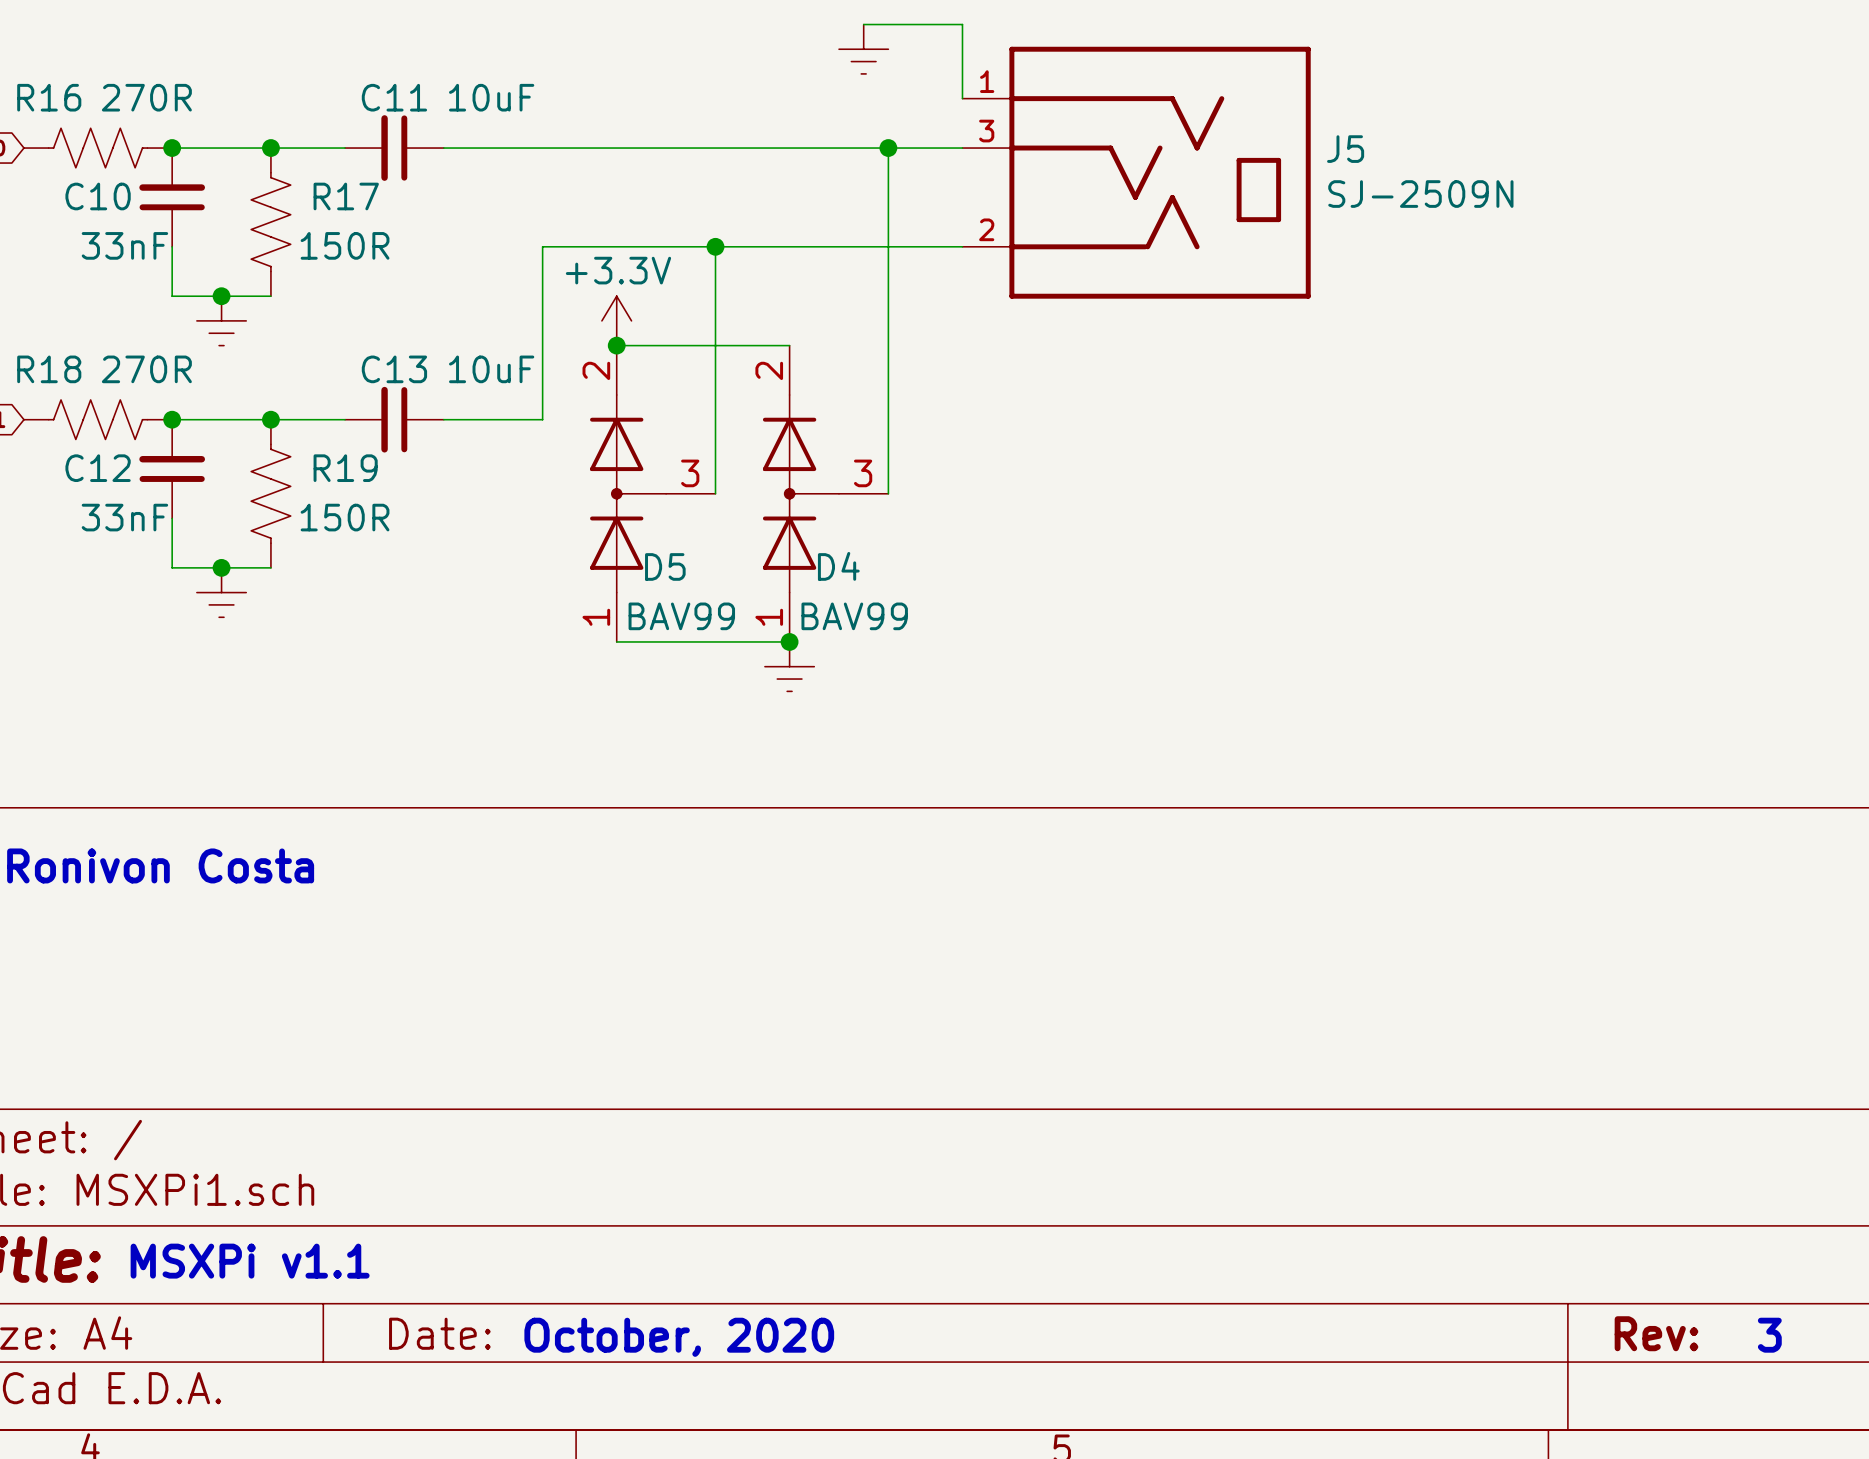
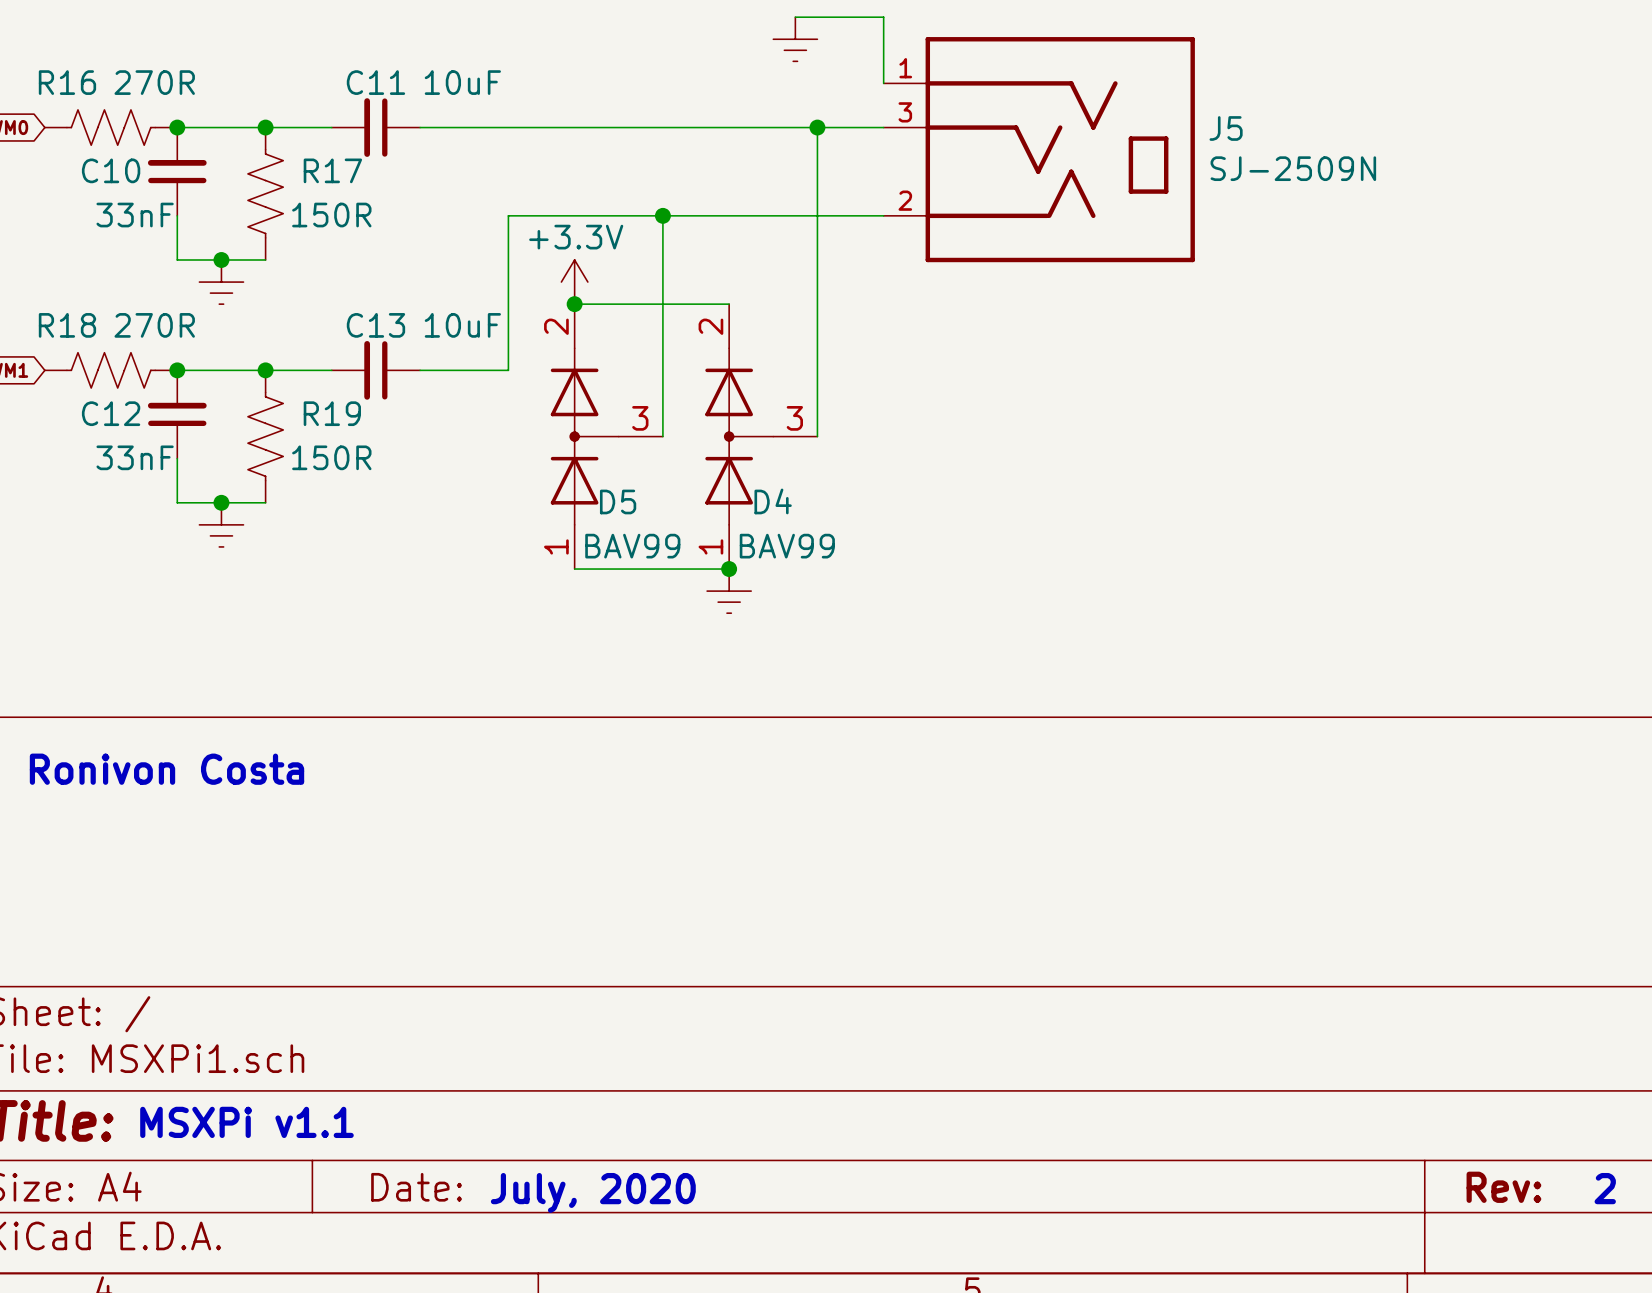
text: 3 (1769, 1335) -> 2 (1605, 1188)
text: October, 2020 (679, 1337) -> July, 2020 (593, 1192)

